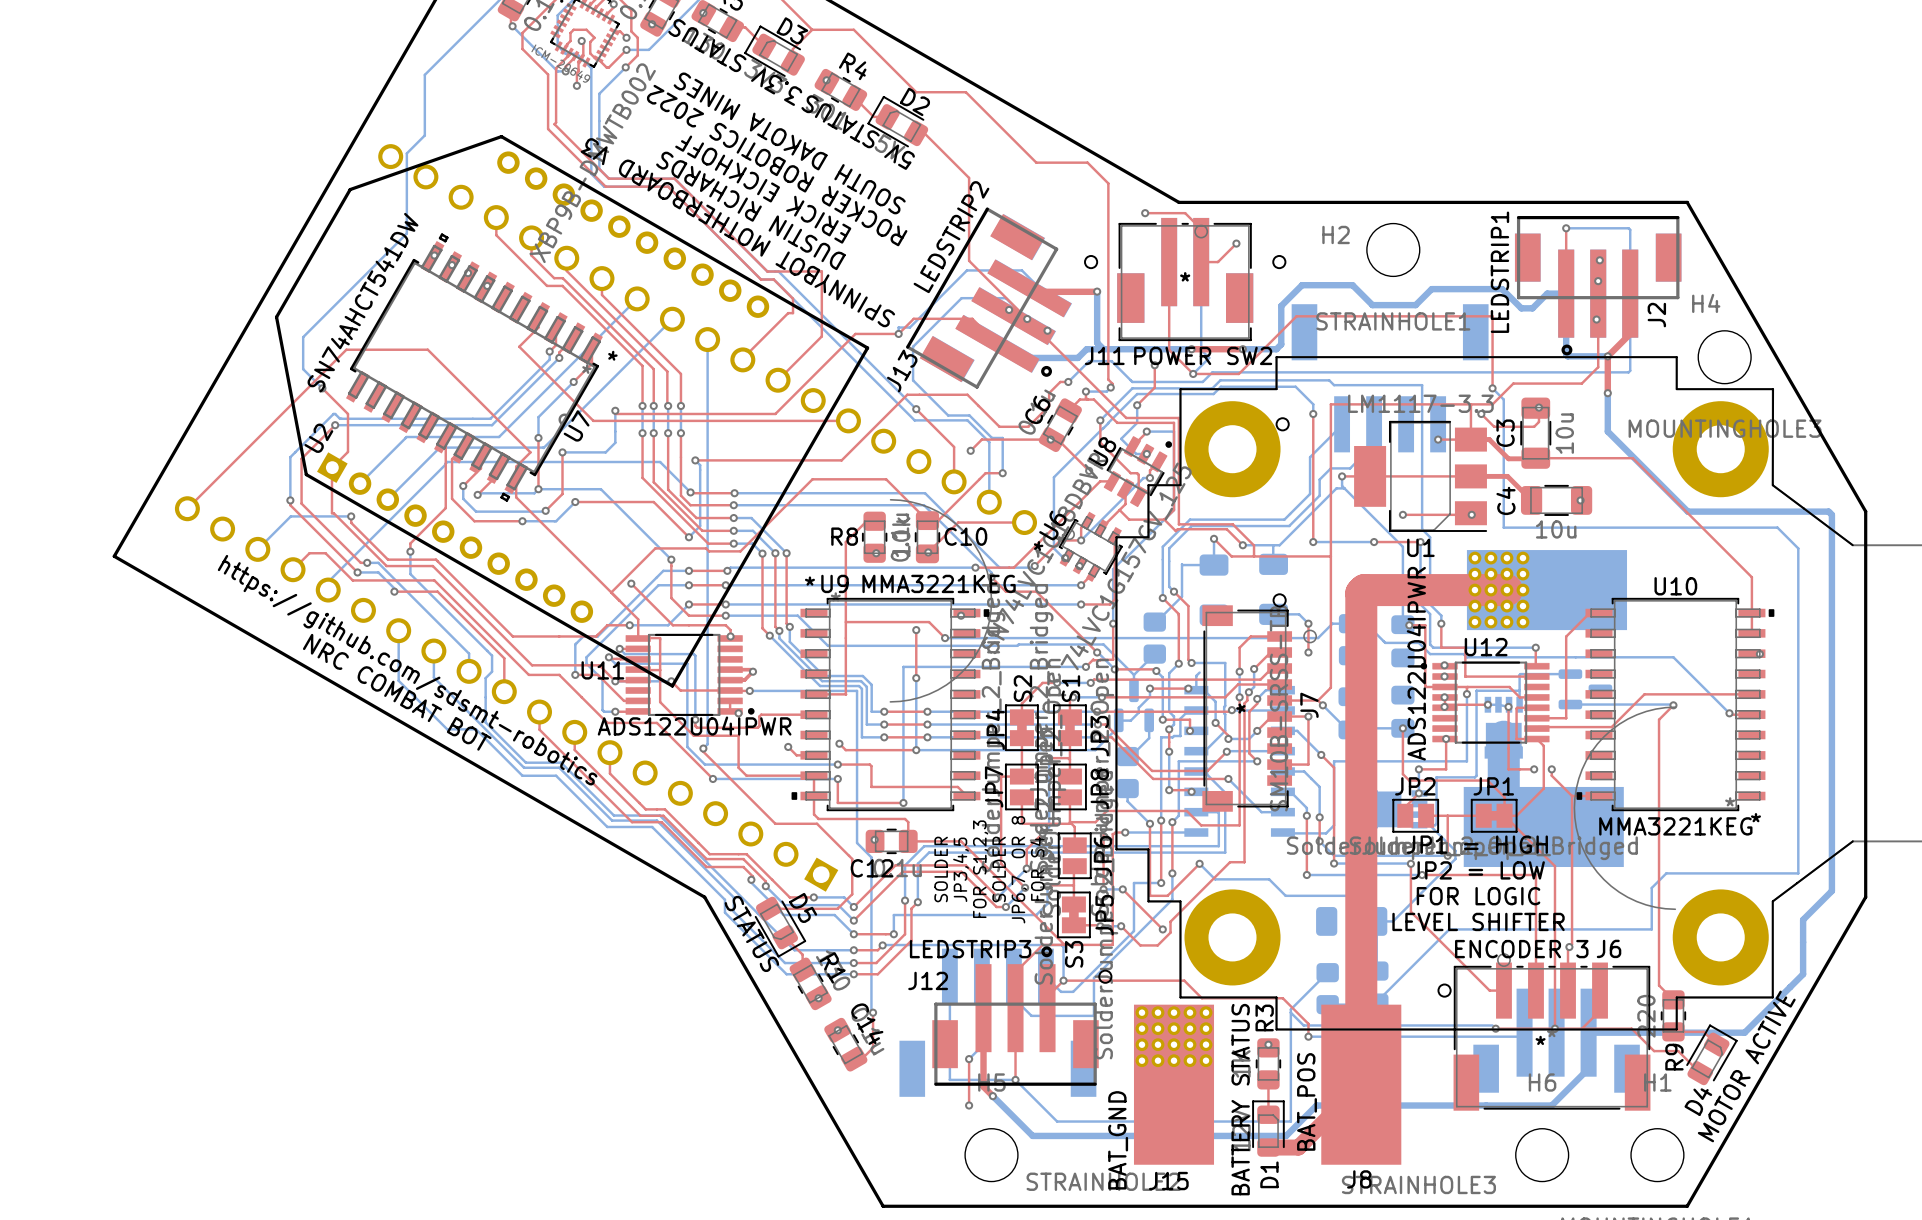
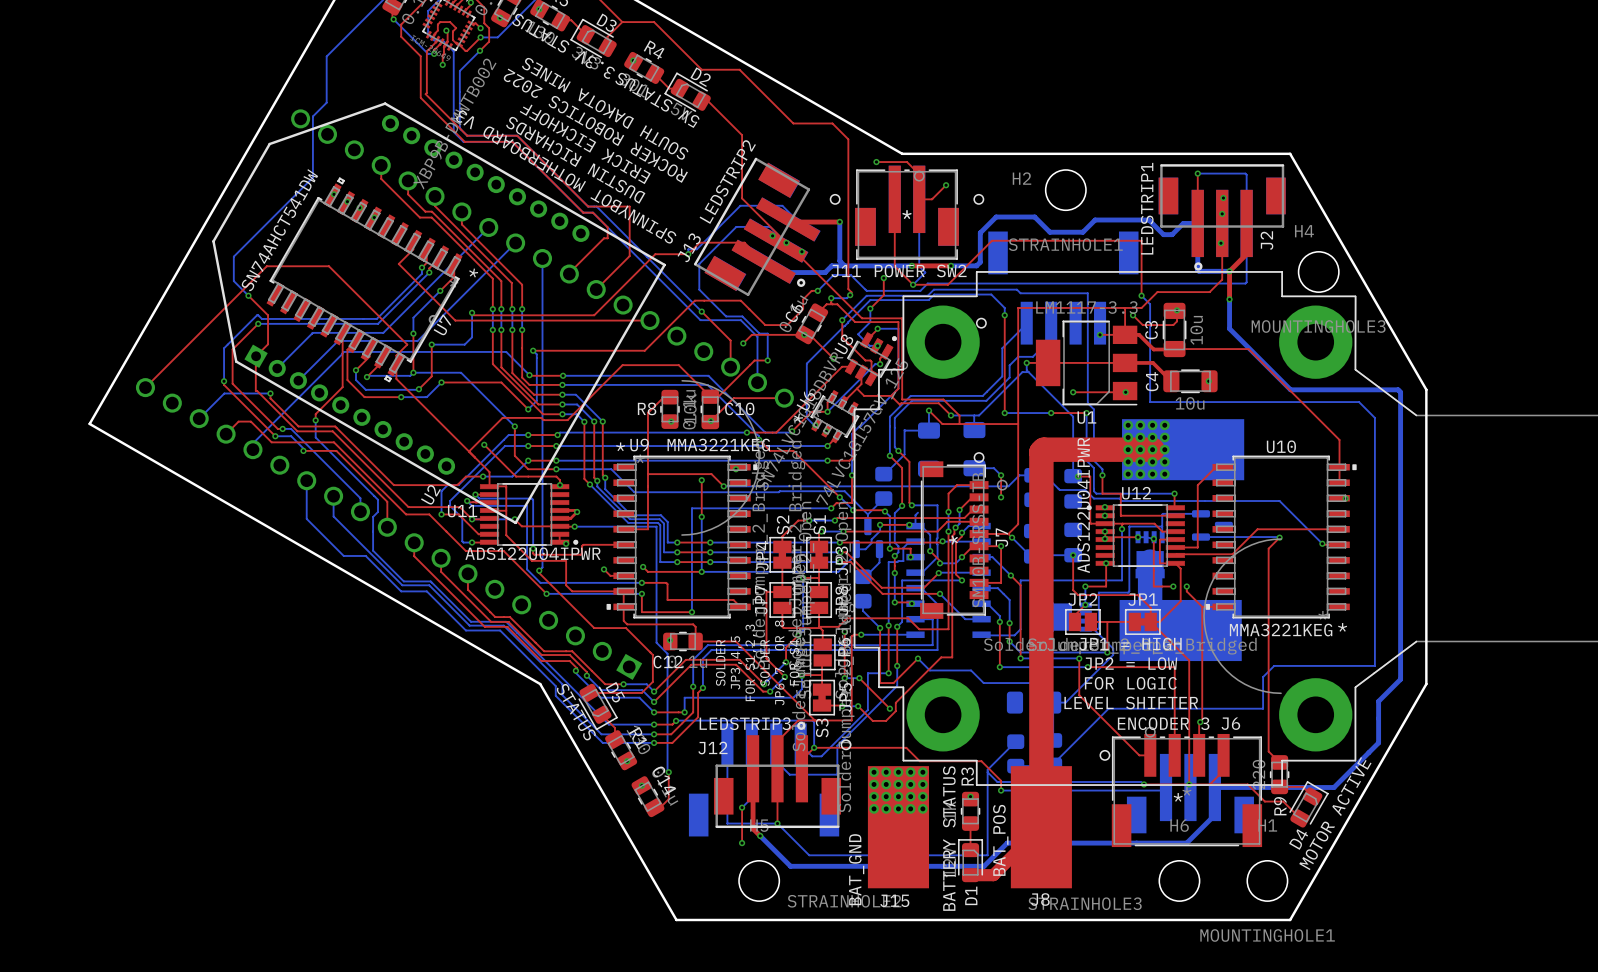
J13 name position: J13 (902, 370) -> J13 (689, 247)
U2 name position: U2 (318, 438) -> U2 (430, 494)
text: https://github.com/sdsmt-robotics (407, 670) -> none
text: NRC COMBAT BOT (397, 692) -> none

